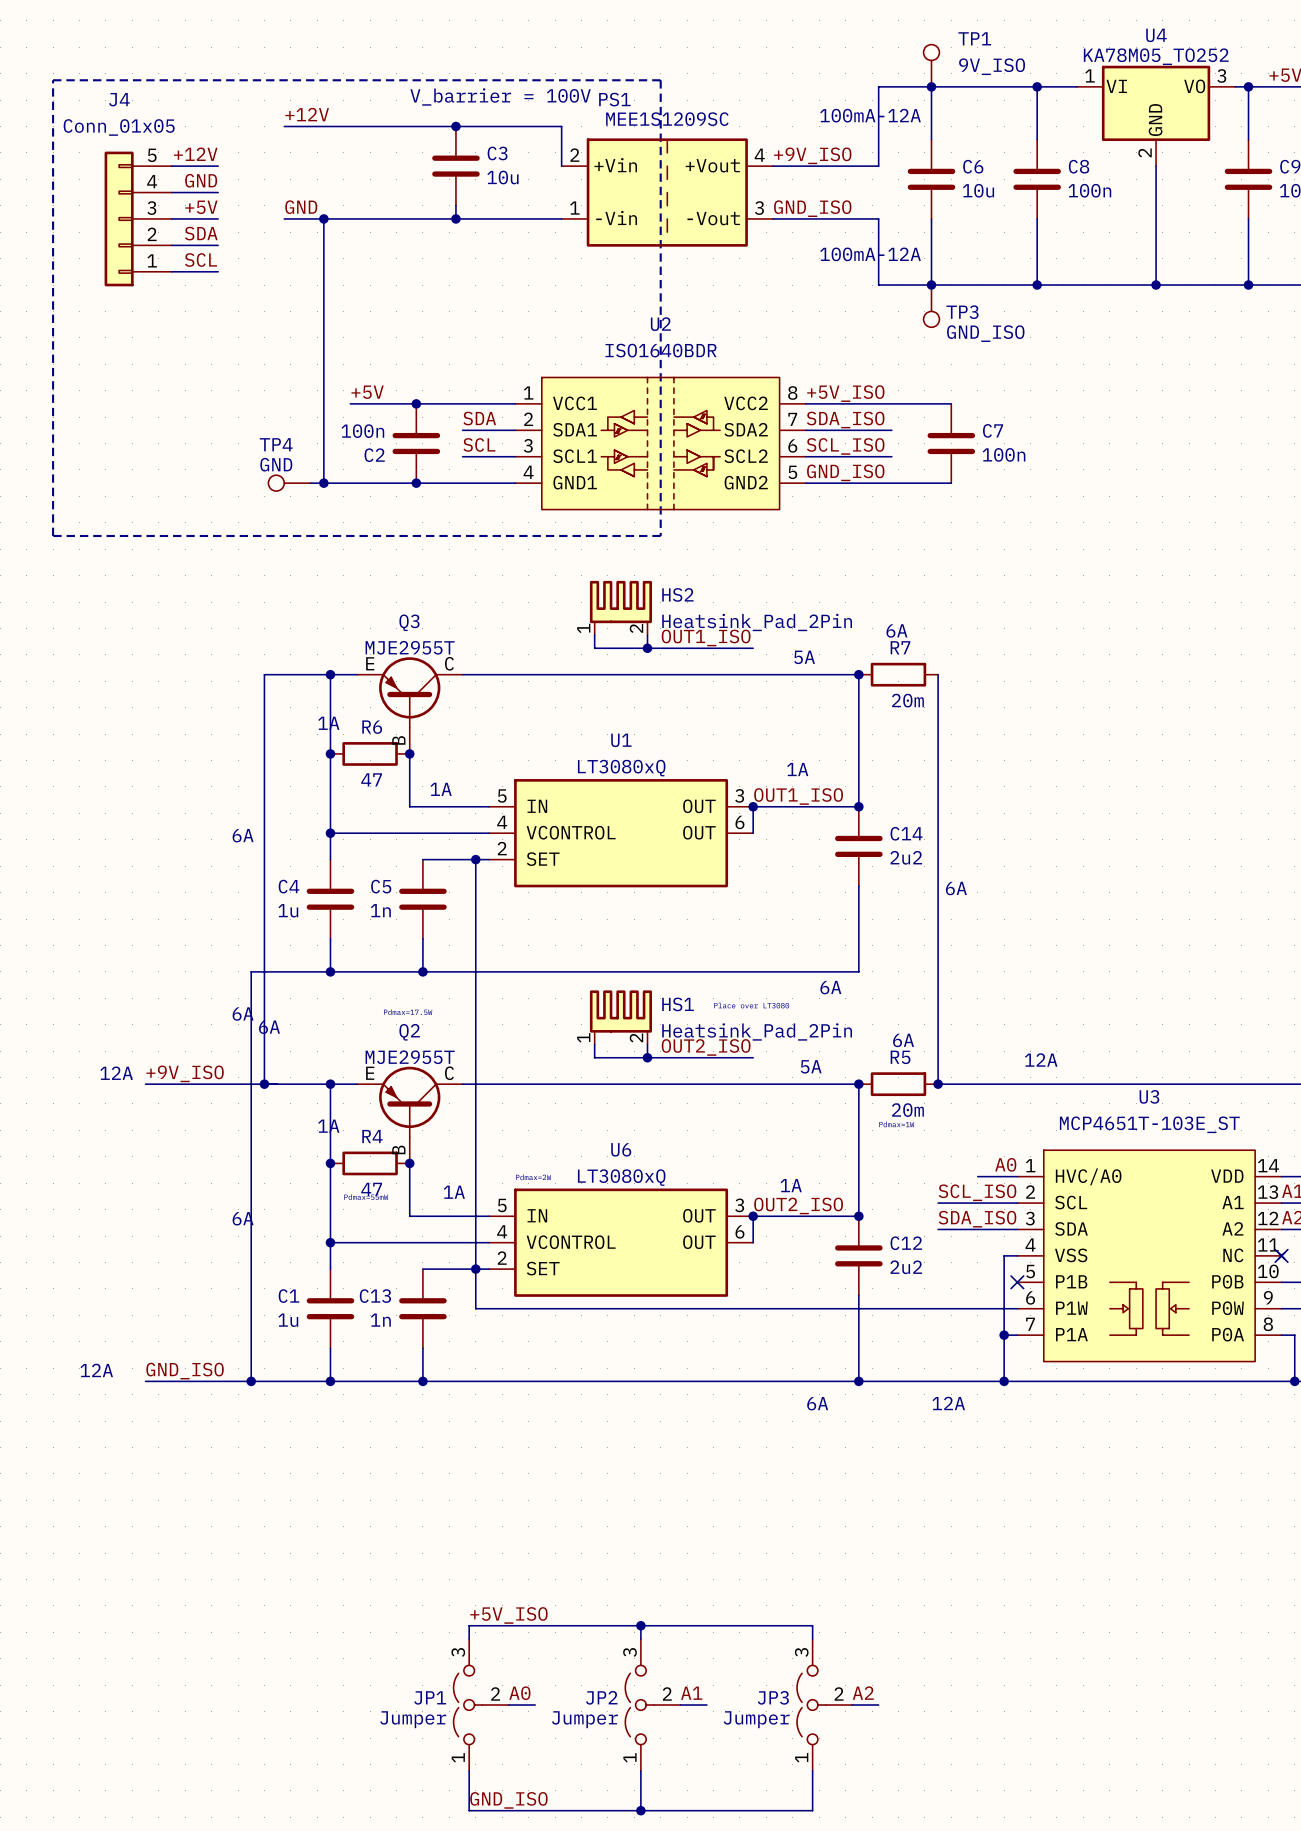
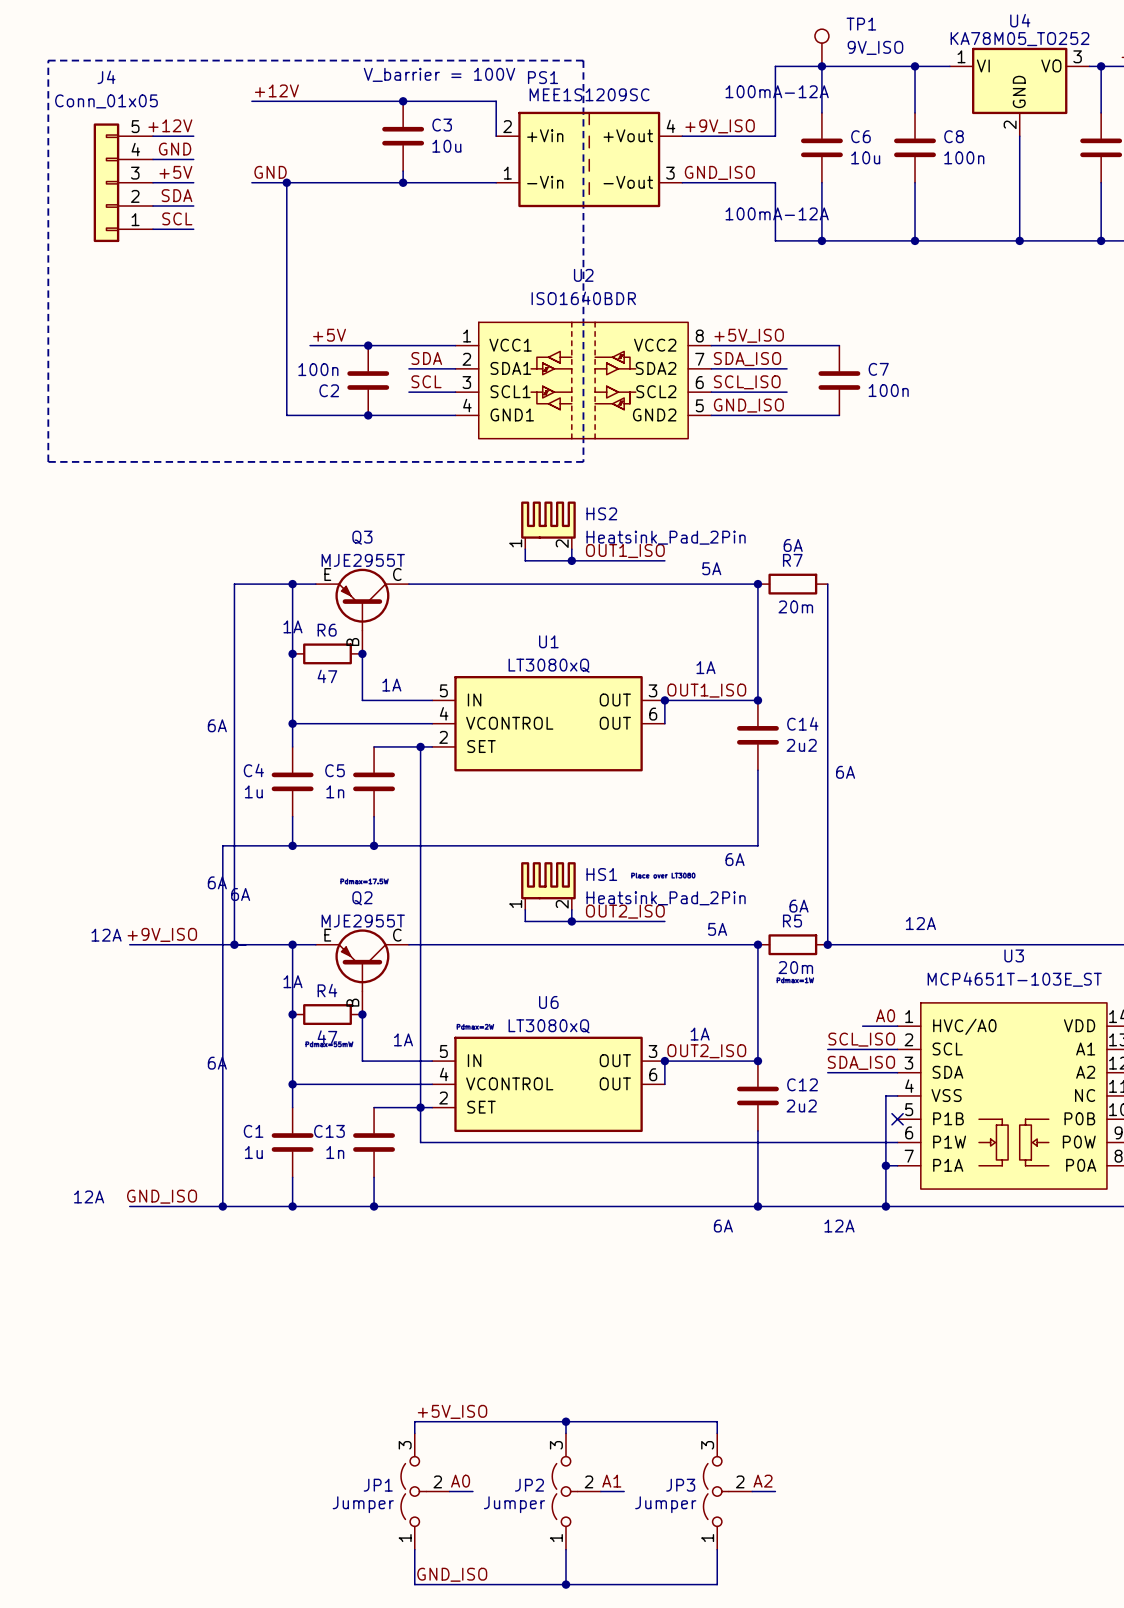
TP3: GND_ISO (931, 306) -> none
TP4: GND (289, 483) -> none
wire: (310, 483) (323, 483) -> none
junction: (323, 483) -> none

